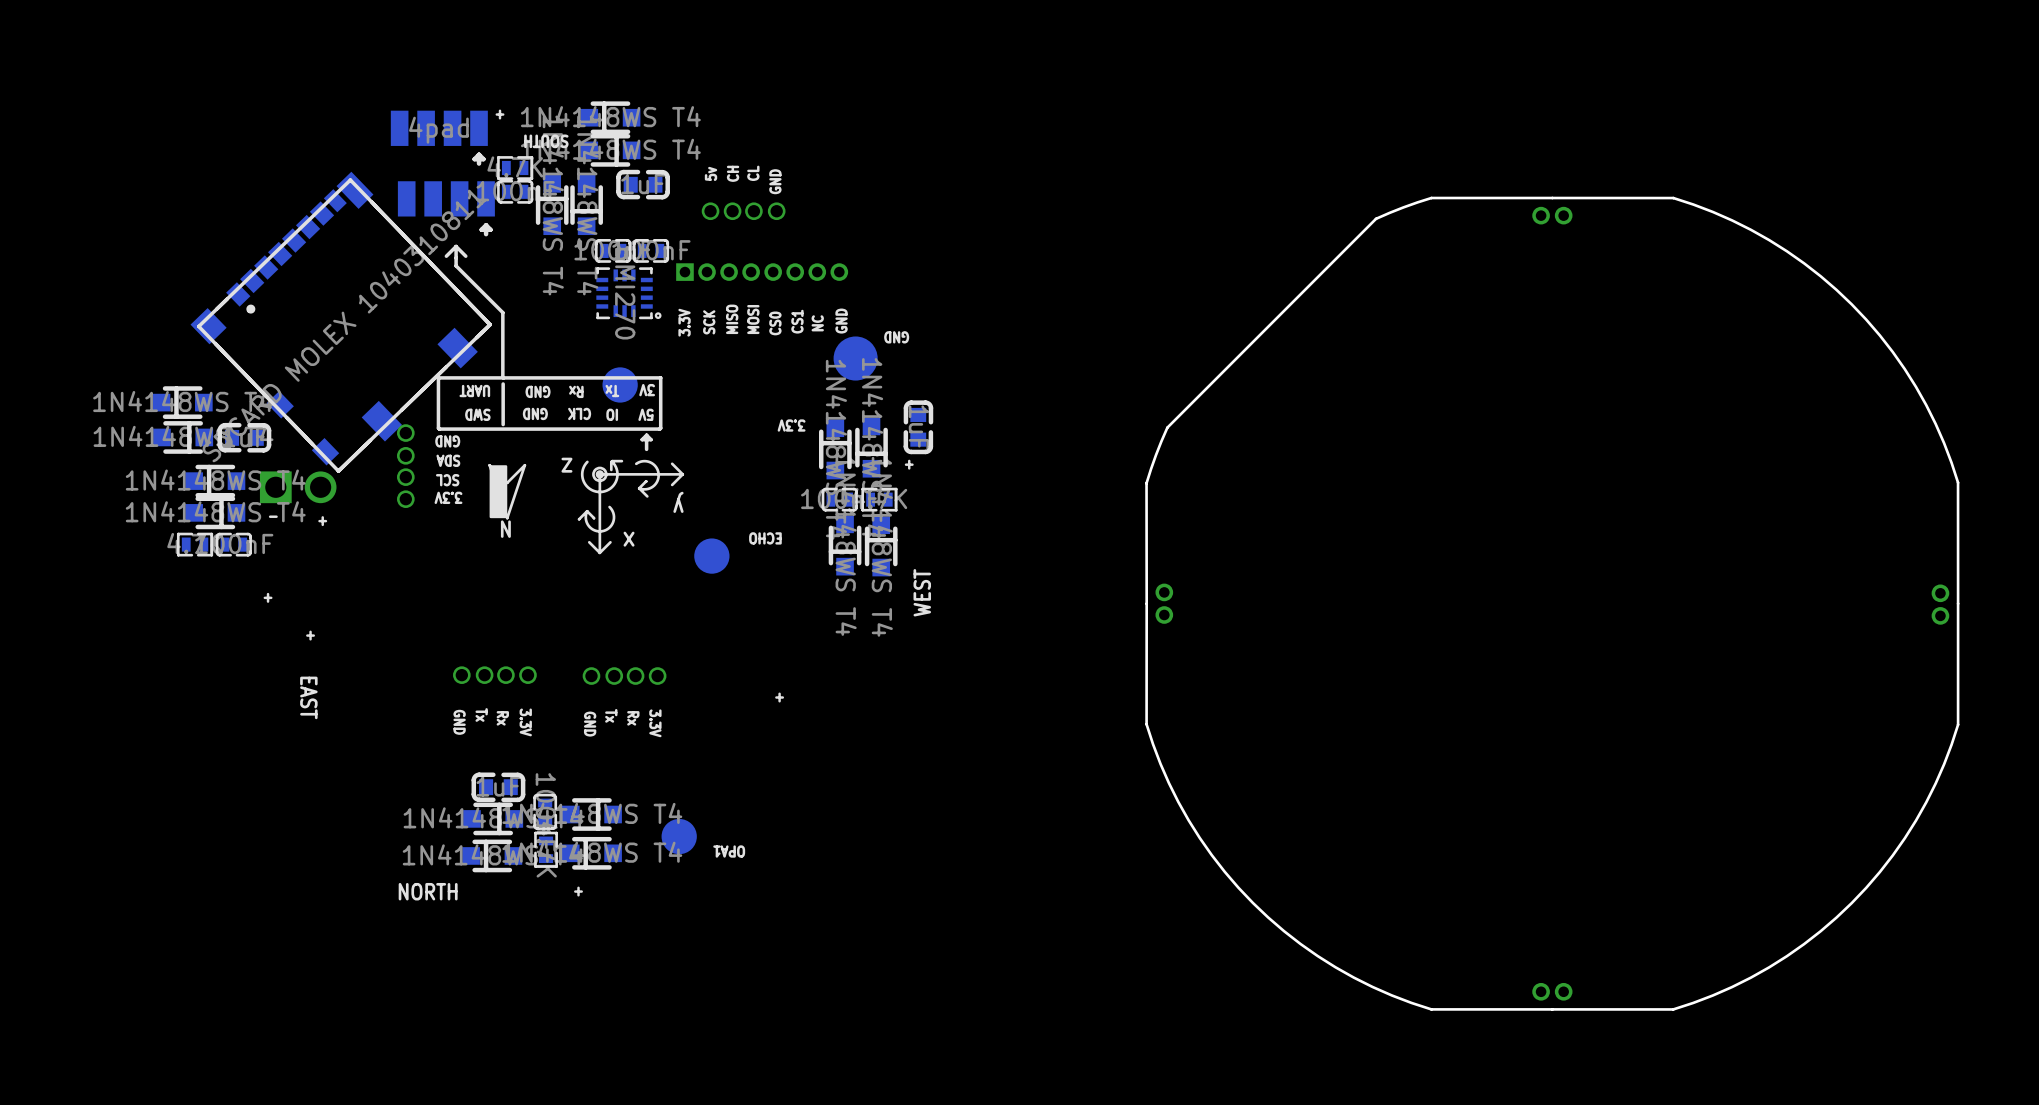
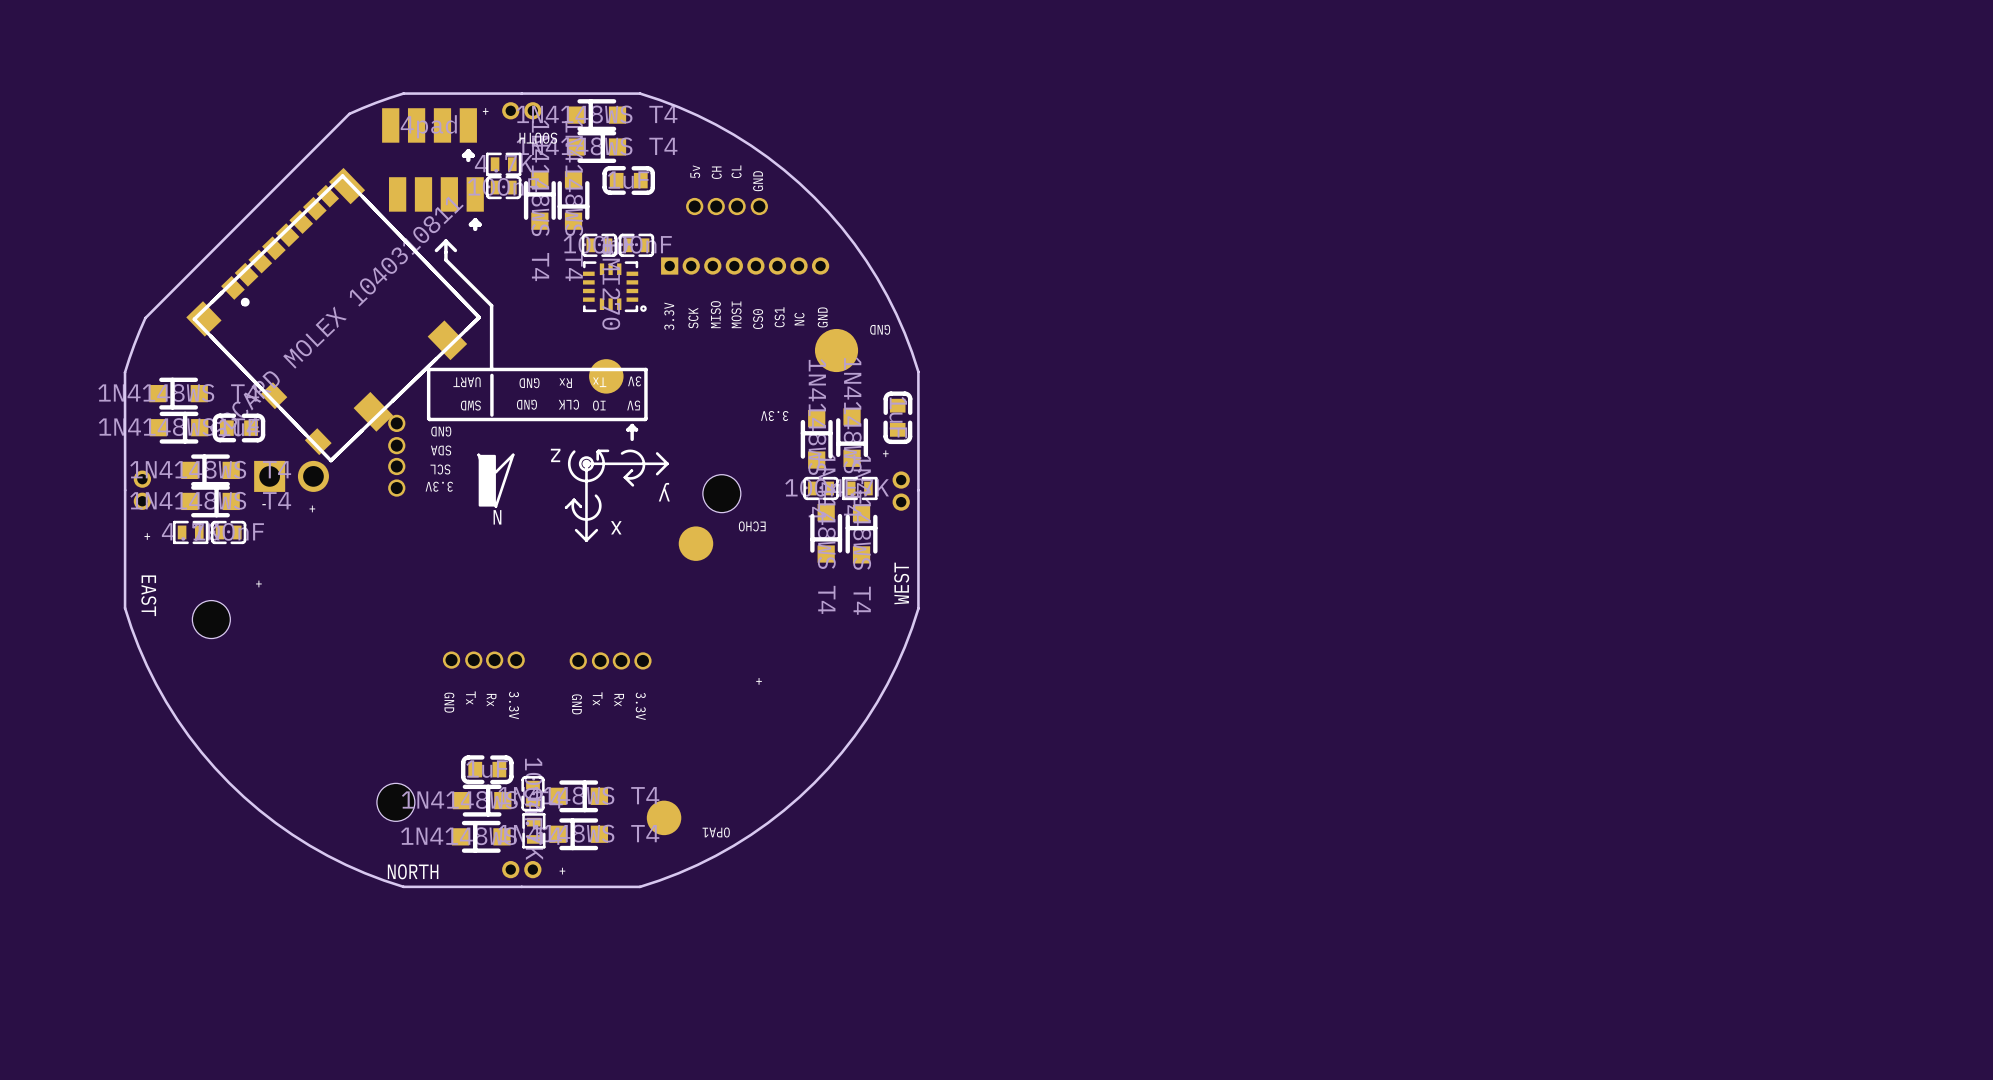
board edge: none -> (640, 93) (403, 93) (349, 113) (145, 318) (125, 372) (125, 608) (138, 646) (156, 684) (177, 719) (201, 752) (229, 782) (259, 810) (292, 834) (327, 855) (364, 873) (403, 886) (639, 886) (678, 873) (715, 855) (751, 834) (784, 810) (814, 782) (841, 752) (866, 719) (887, 684) (904, 647) (918, 608) (918, 371) (904, 333) (887, 296) (866, 260) (841, 227) (814, 197) (784, 170) (751, 145) (715, 124) (678, 107) (640, 93)
part: none -> (521, 110)
board edge: (1673, 198) (1431, 198) (1376, 218) (1167, 427) (1146, 483) (1146, 724) (1160, 763) (1178, 801) (1199, 838) (1224, 871) (1252, 902) (1284, 931) (1317, 956) (1353, 977) (1391, 995) (1431, 1009) (1673, 1009) (1712, 995) (1750, 977) (1786, 956) (1820, 931) (1851, 903) (1879, 872) (1904, 838) (1926, 802) (1944, 764) (1958, 724) (1958, 482) (1944, 443) (1926, 405) (1904, 369) (1879, 335) (1851, 304) (1820, 276) (1786, 251) (1750, 229) (1712, 212) (1673, 198) -> none
part: (1552, 215) -> none
part: none -> (142, 490)
part: none -> (721, 493)
part position: (1164, 603) -> (901, 491)
part: (1940, 604) -> none
part: none -> (211, 619)
text position: + (310, 635) -> + (147, 536)
text position: EAST (308, 697) -> EAST (148, 595)
part: none -> (395, 802)
part: none -> (521, 869)
part: (1552, 991) -> none

